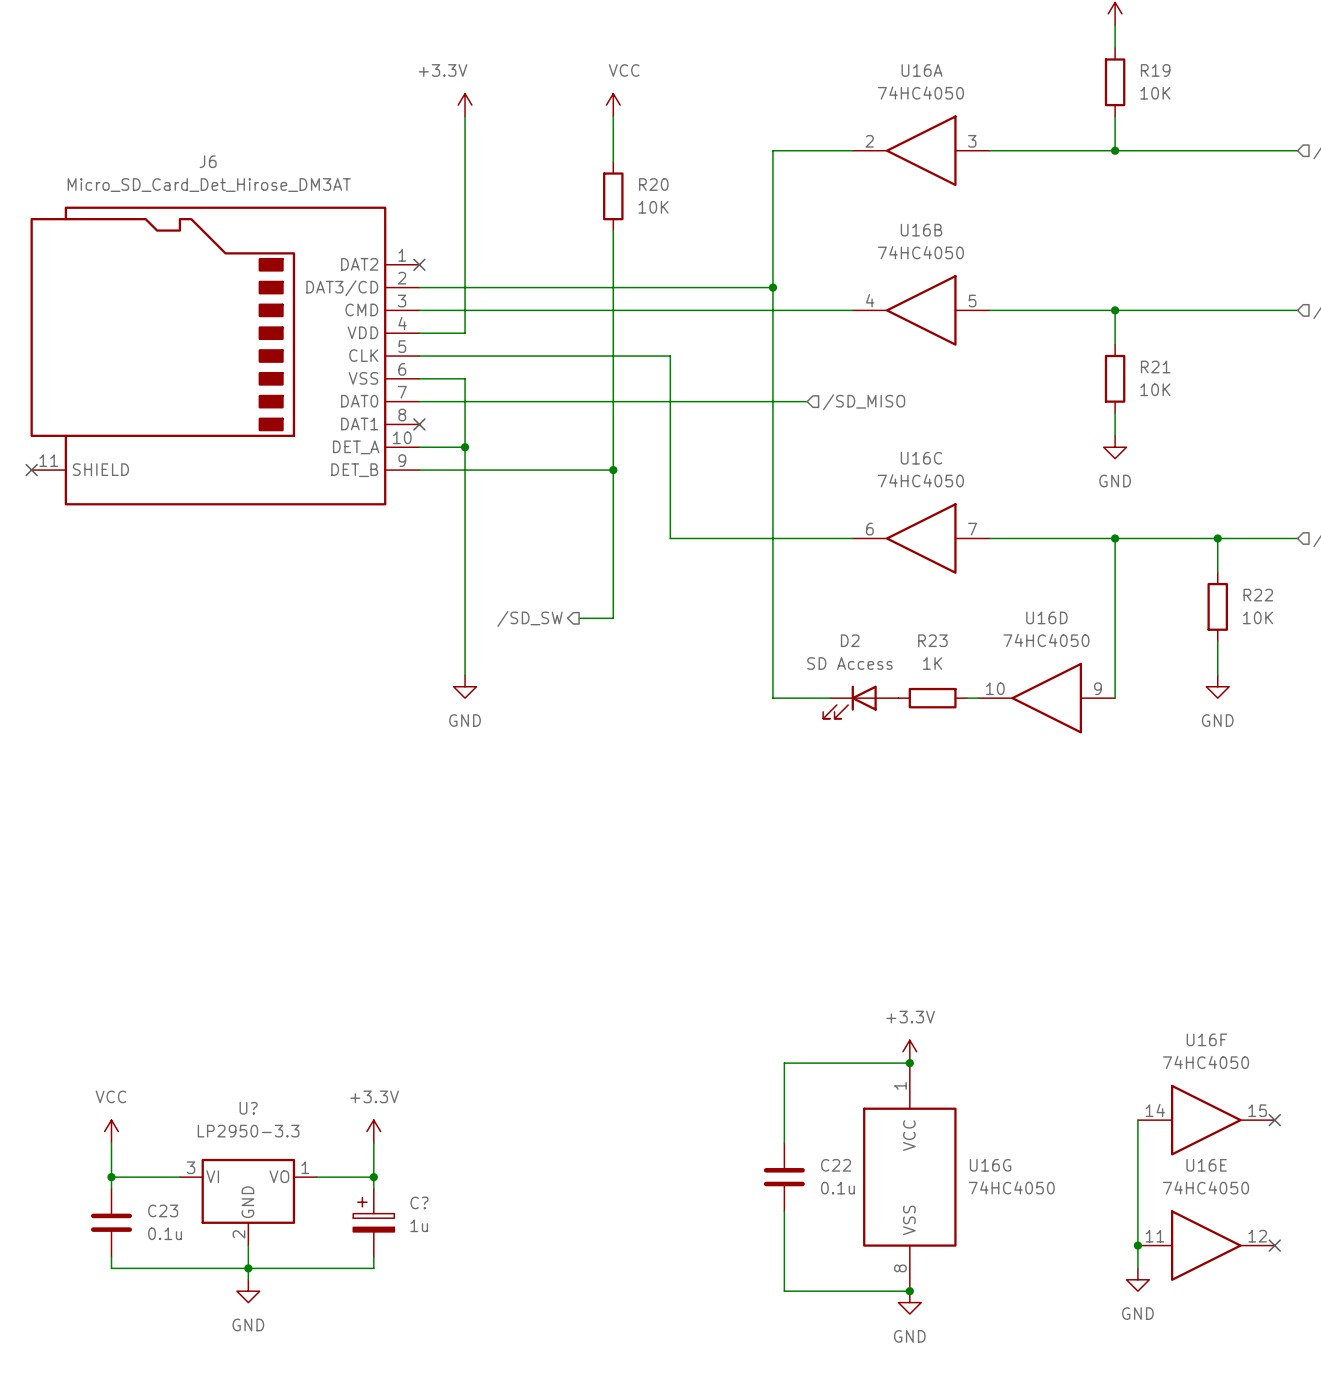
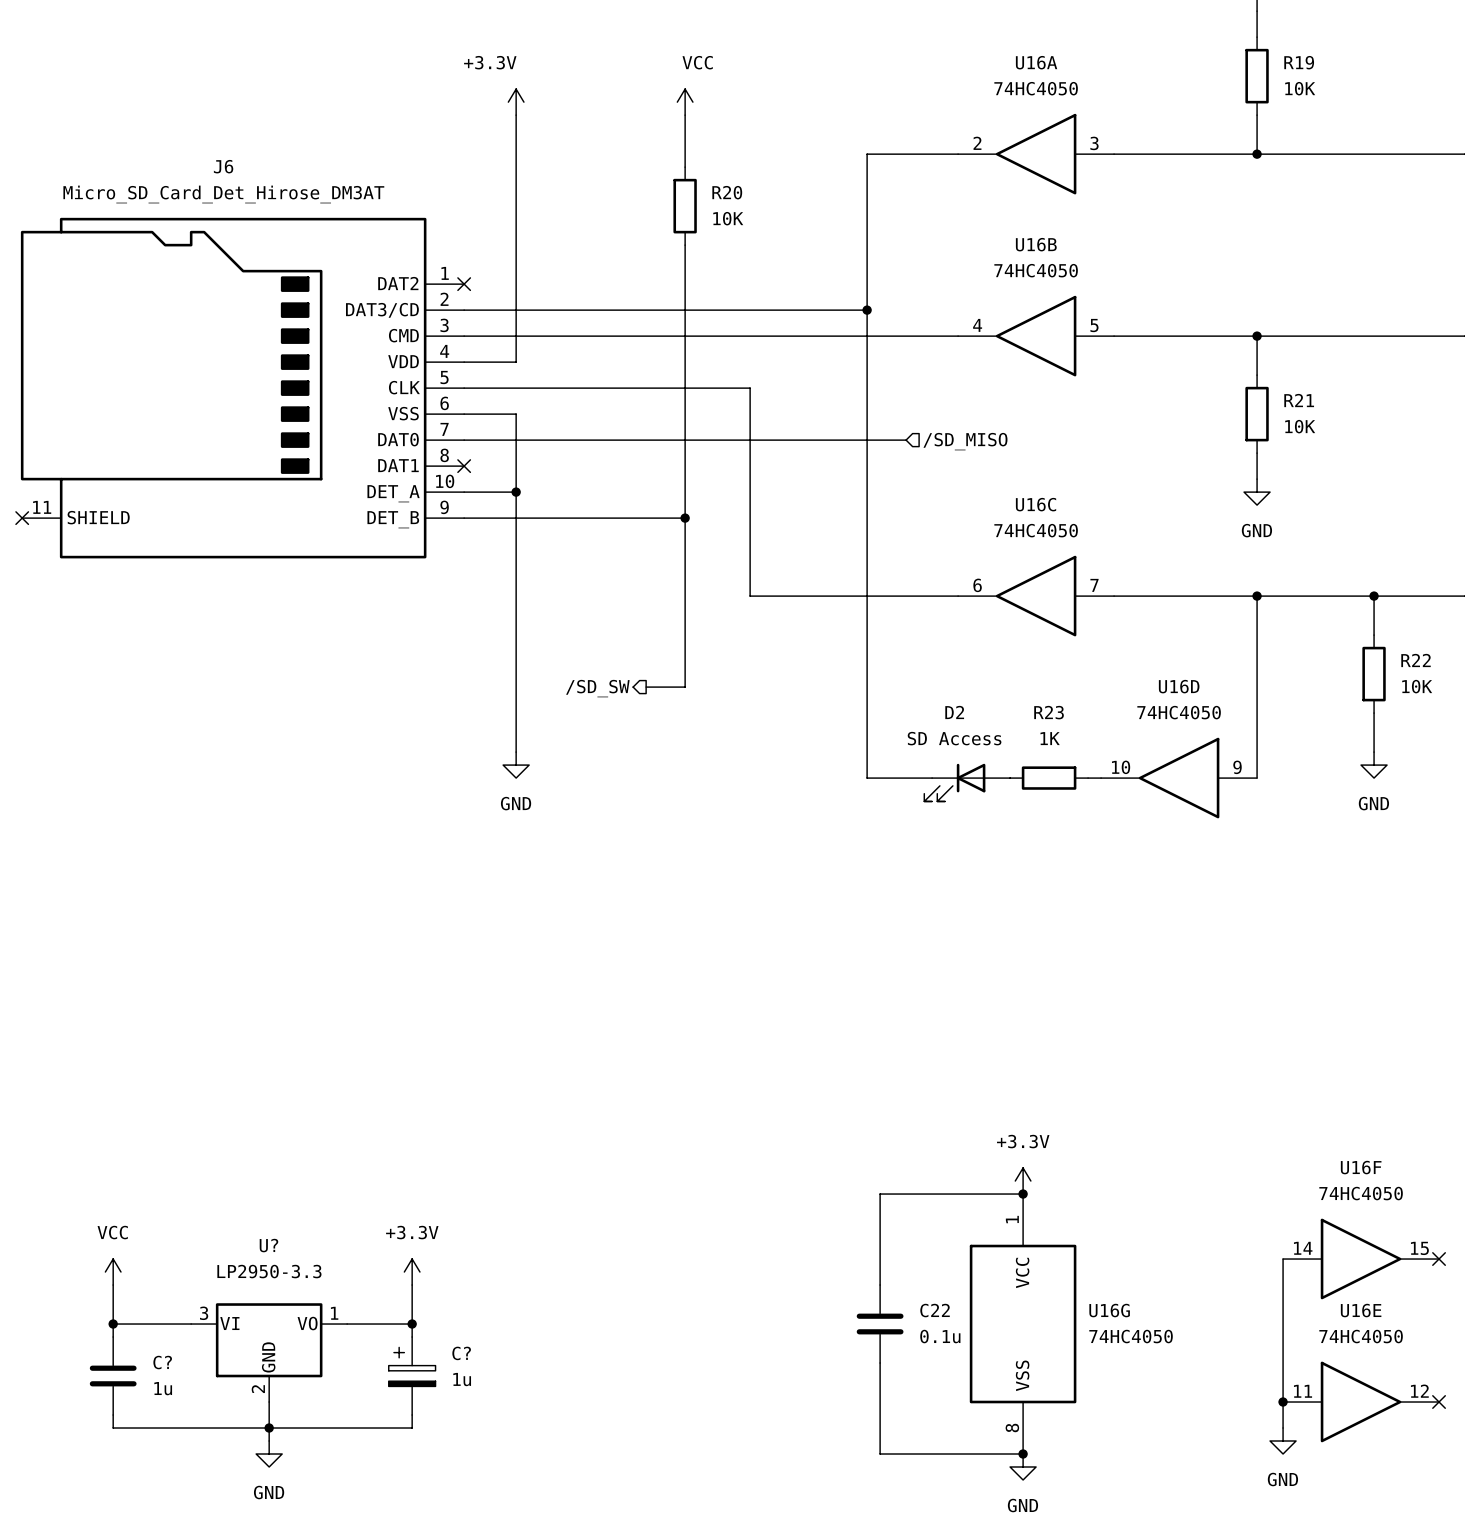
C23 name: C23 (163, 1210) -> C? (162, 1362)
C23 value: 0.1u (165, 1233) -> 1u (163, 1388)

